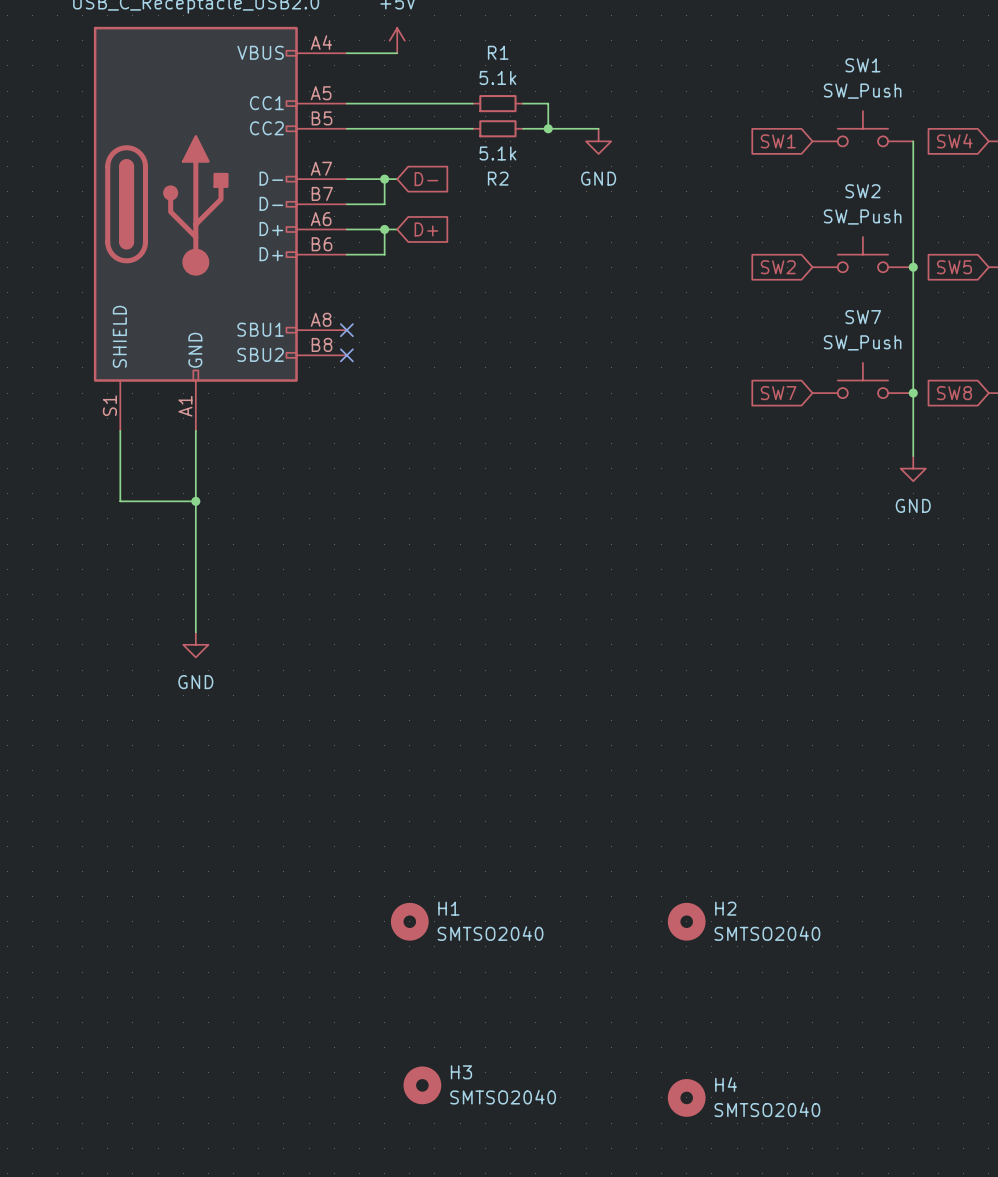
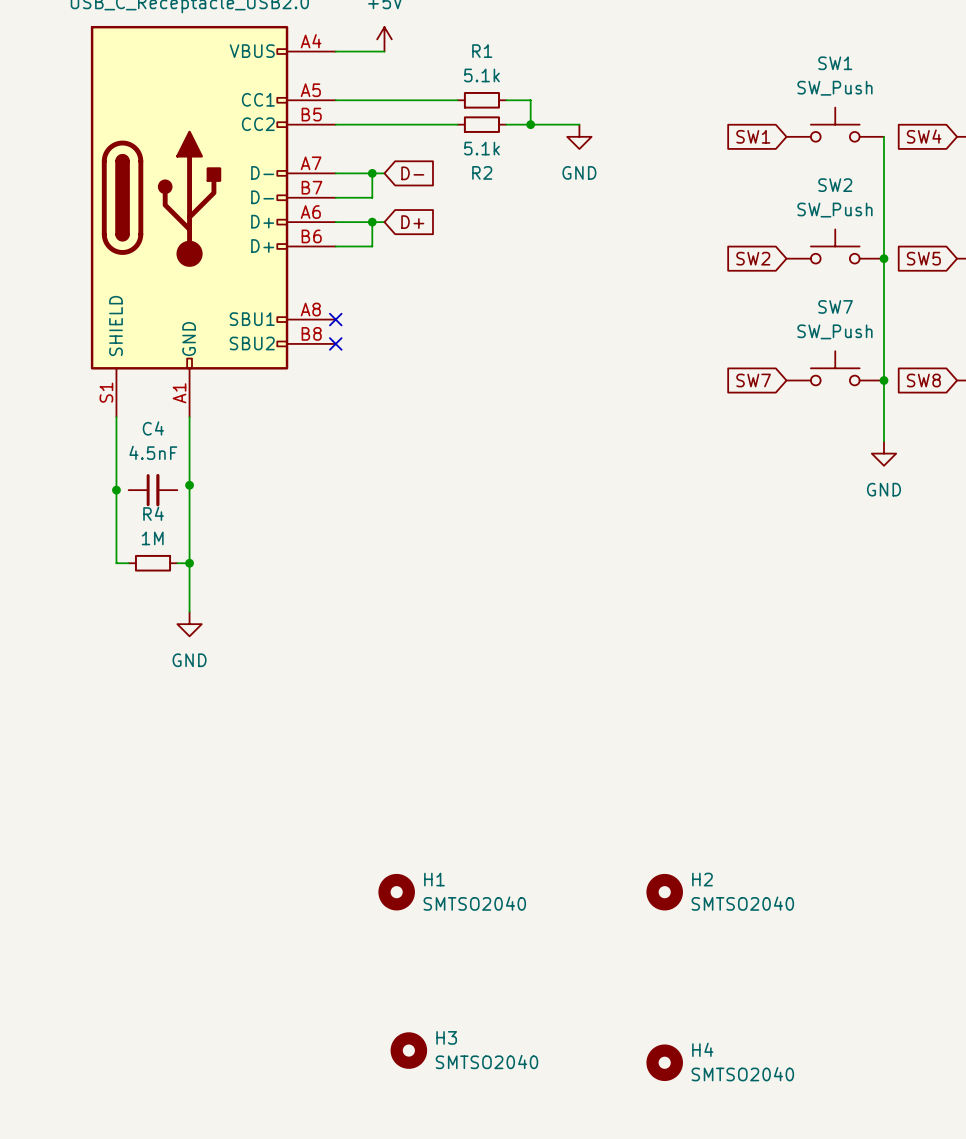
wire: (120, 501) (195, 501) -> (116, 485) (116, 563) (128, 563)
junction: none -> (116, 490)
C4: none -> 4.5nF (153, 490)
R4: none -> 1M (153, 563)
wire: none -> (177, 563) (189, 563)
junction: none -> (189, 563)

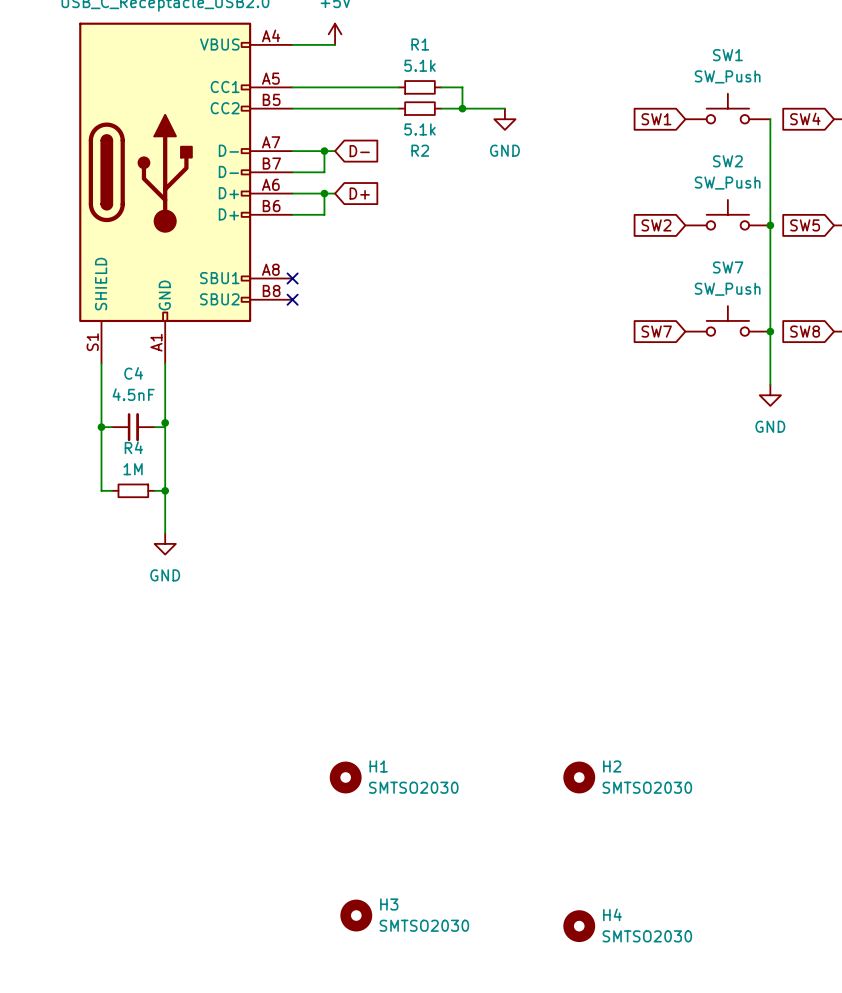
wire: none -> (101, 427) (112, 427)
wire: none -> (154, 427) (165, 427)
H1 value: SMTSO2040 (474, 903) -> SMTSO2030 (413, 787)
H2 value: SMTSO2040 (742, 903) -> SMTSO2030 (647, 787)
H3 value: SMTSO2040 (486, 1062) -> SMTSO2030 (424, 925)
H4 value: SMTSO2040 (742, 1074) -> SMTSO2030 (647, 936)

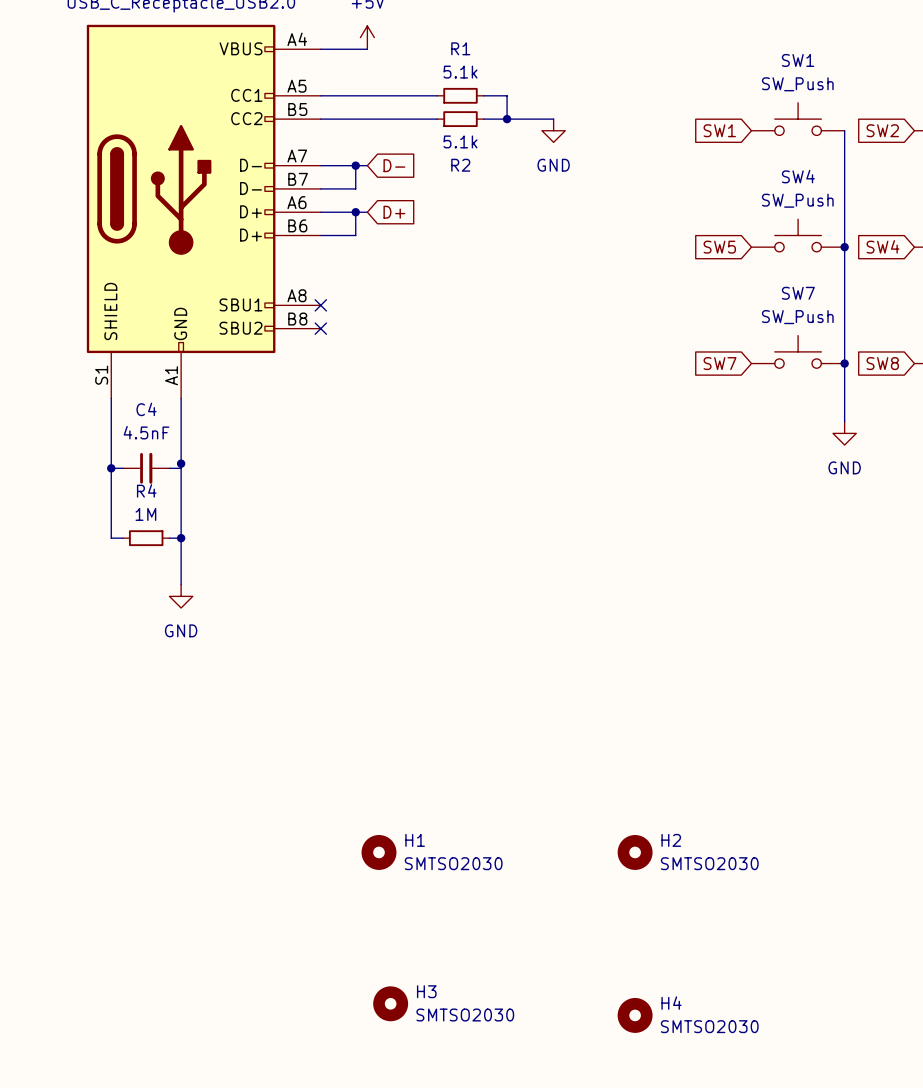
global label: SW4 (805, 118) -> SW2 (882, 130)
SW2 name: SW2 (727, 161) -> SW4 (798, 176)
global label: SW2 (656, 225) -> SW5 (719, 247)
global label: SW5 (805, 225) -> SW4 (883, 246)

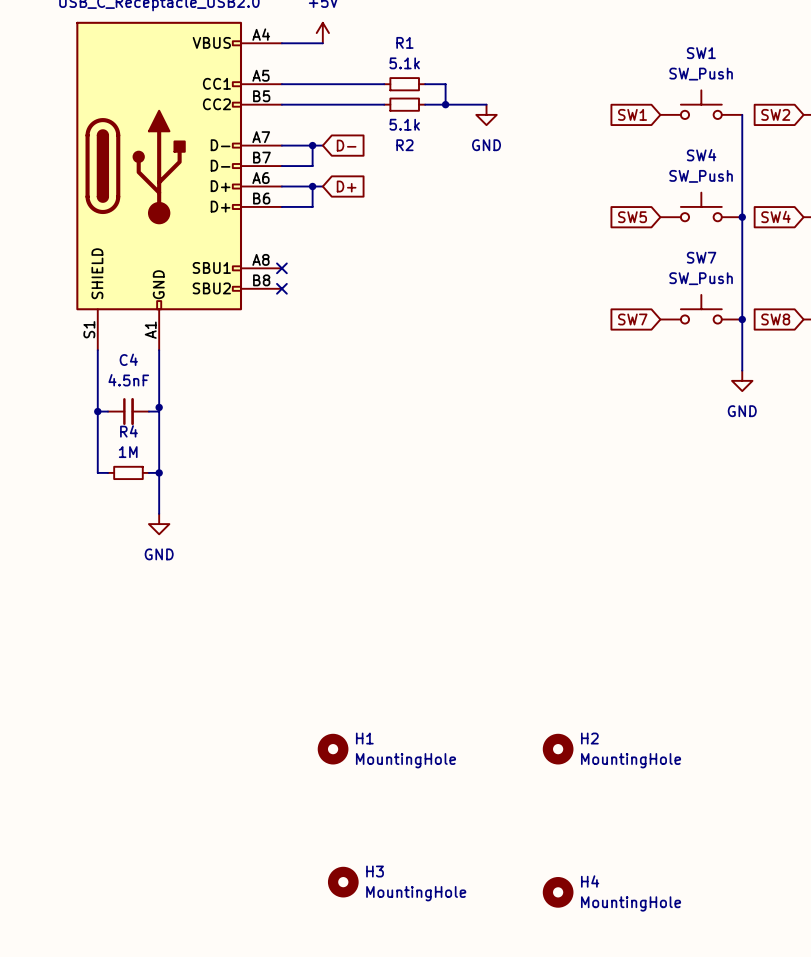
H1 value: SMTSO2030 (453, 863) -> MountingHole (405, 760)
H2 value: SMTSO2030 (709, 863) -> MountingHole (631, 760)
H3 value: SMTSO2030 (465, 1015) -> MountingHole (416, 893)
H4 value: SMTSO2030 (709, 1026) -> MountingHole (631, 903)

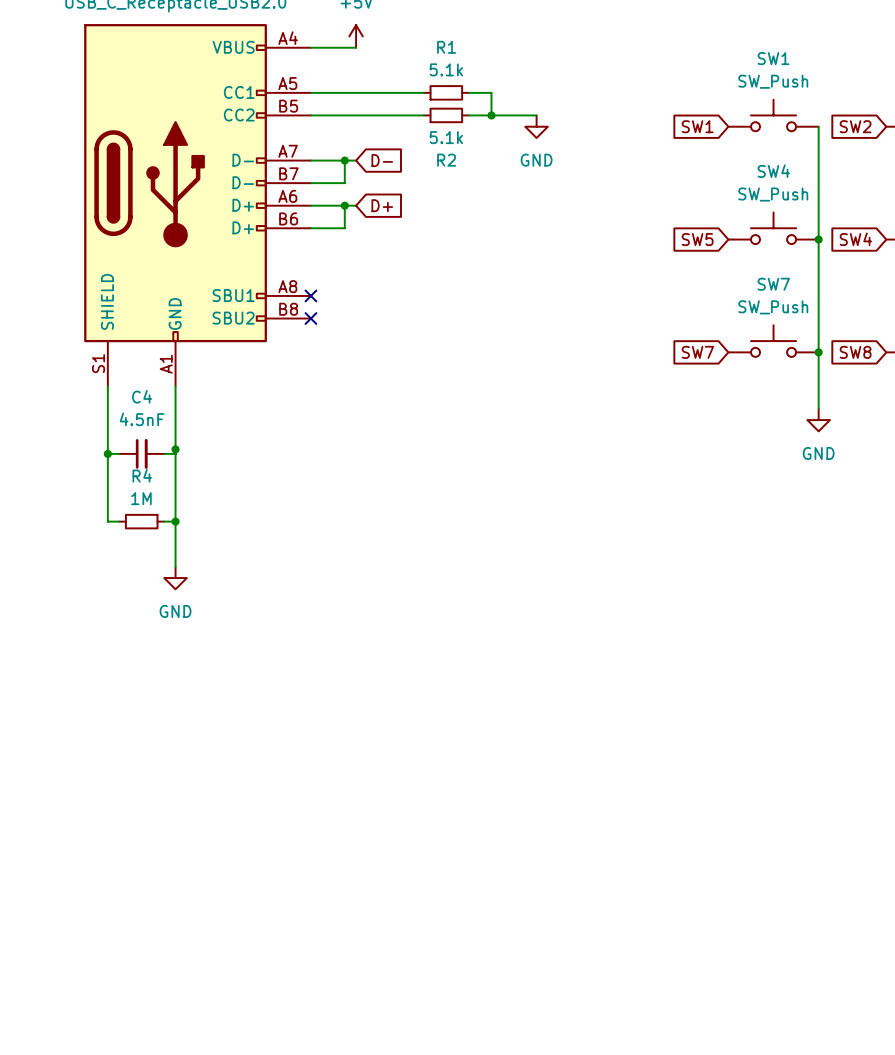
H1: MountingHole (333, 749) -> none
H2: MountingHole (558, 749) -> none
H3: MountingHole (343, 882) -> none
H4: MountingHole (558, 892) -> none

